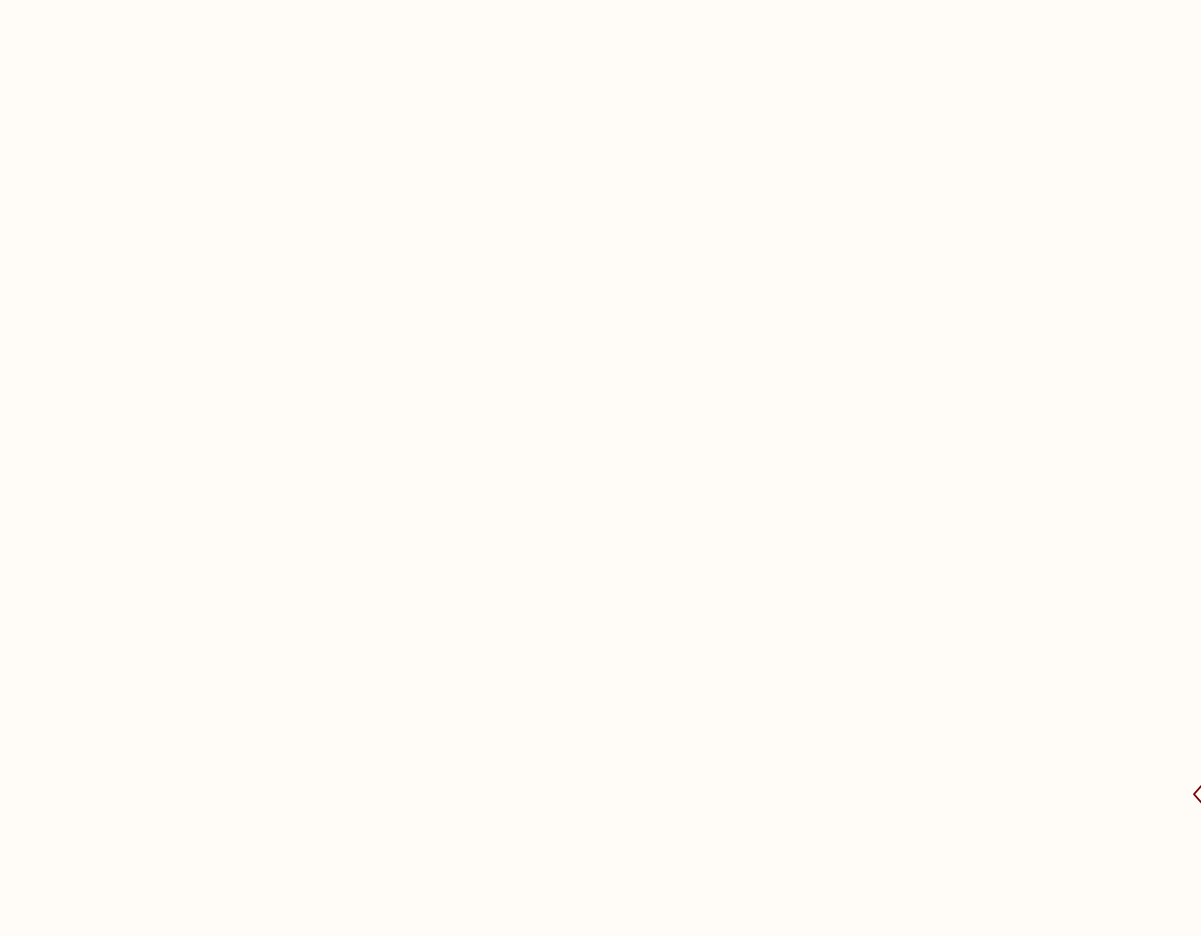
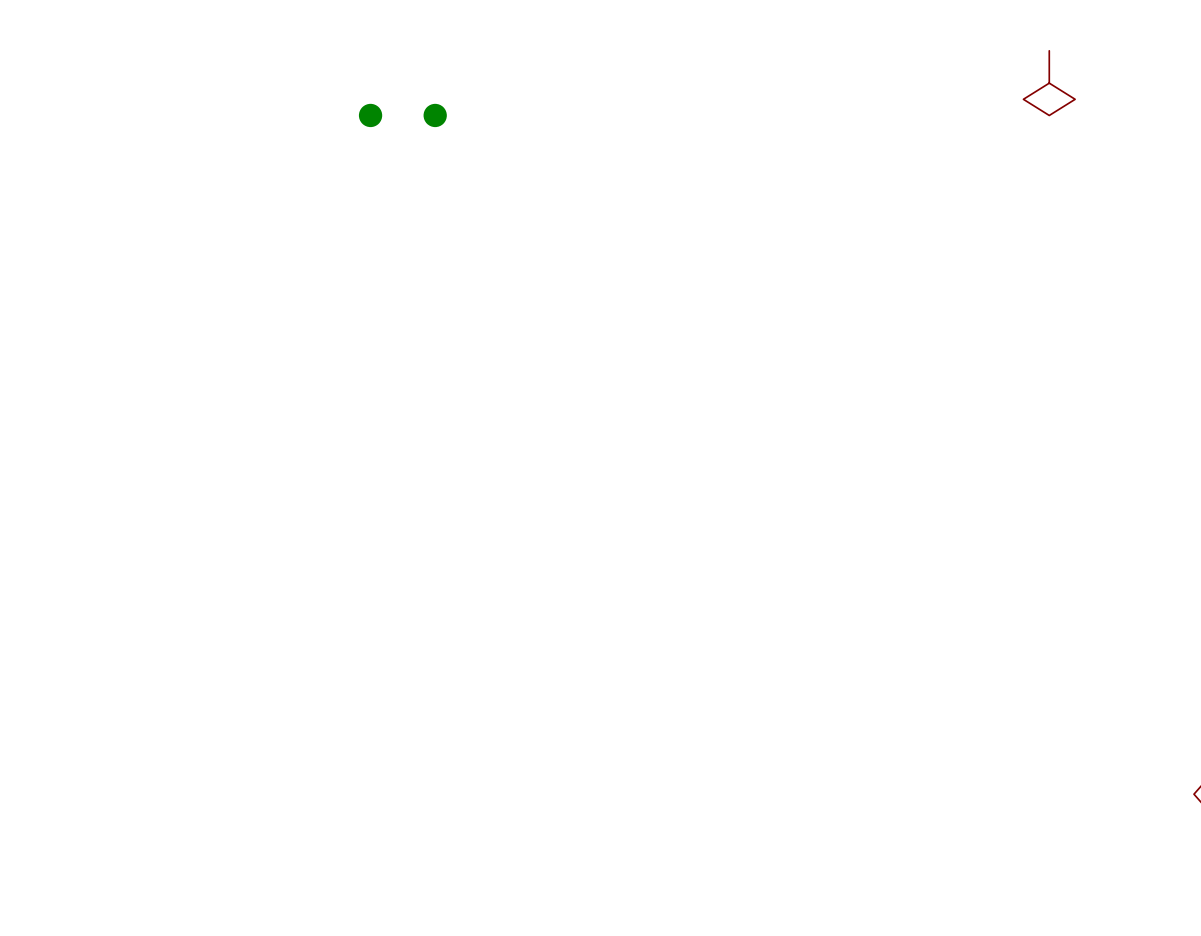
power symbol: none -> (1049, 83)
junction: none -> (370, 115)
junction: none -> (435, 115)

